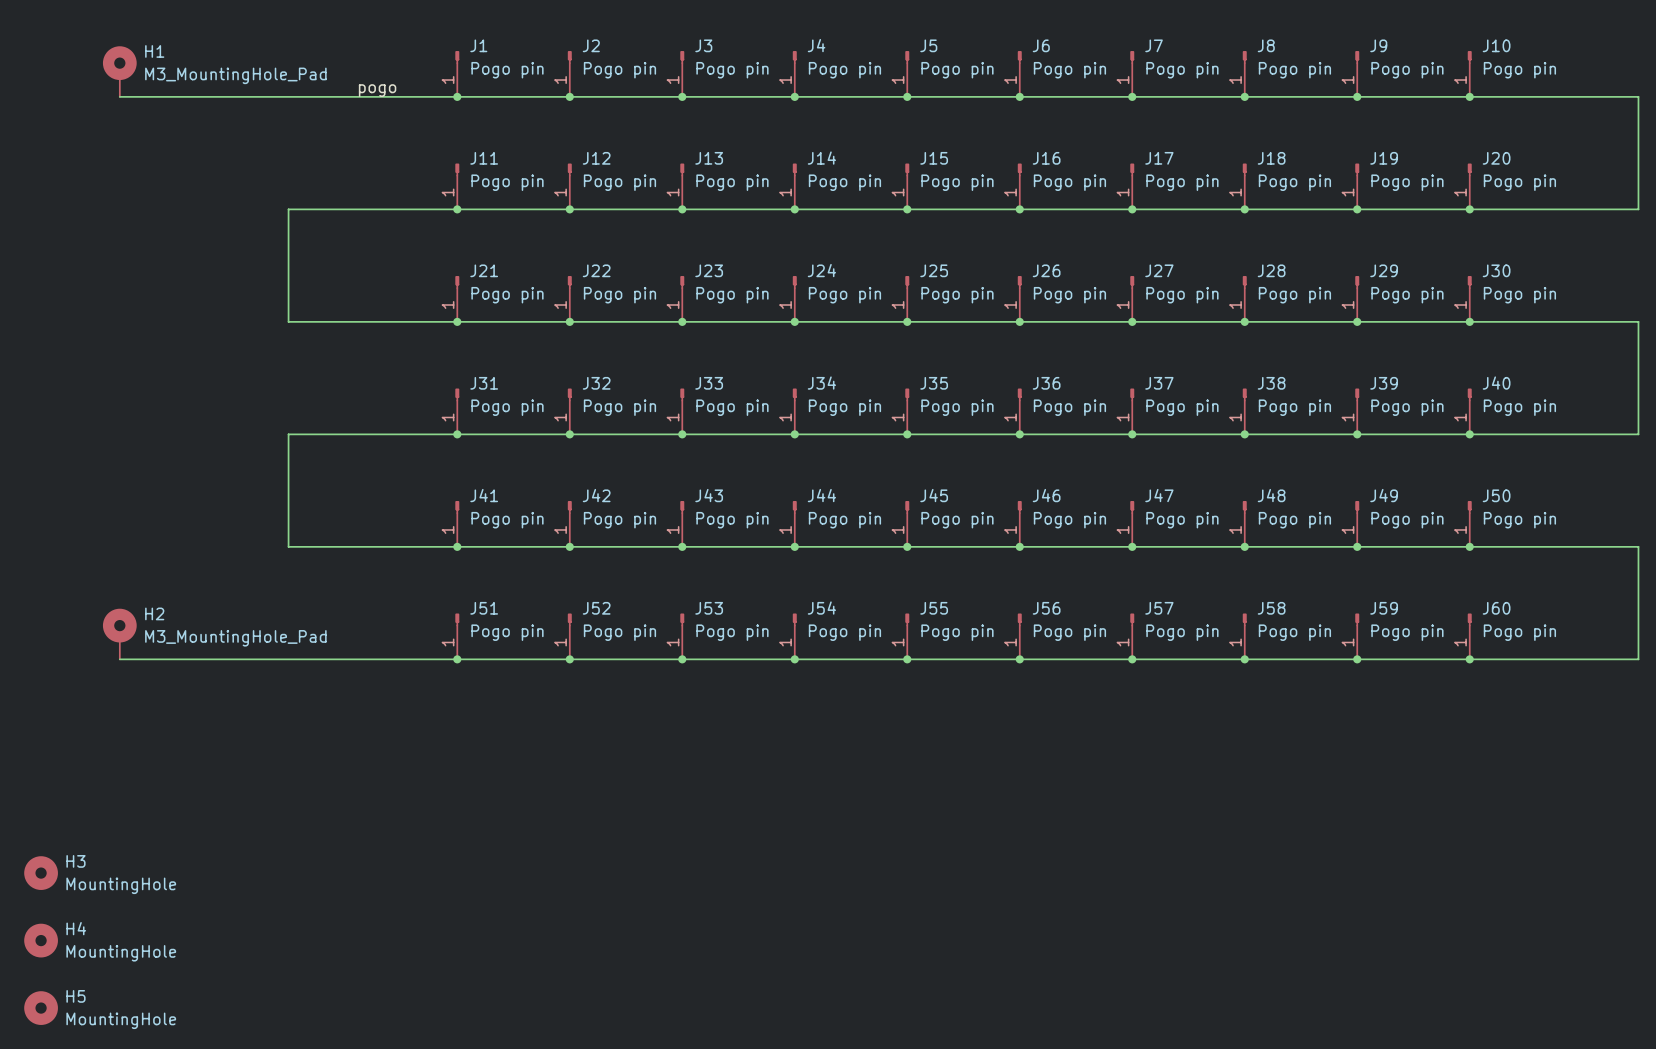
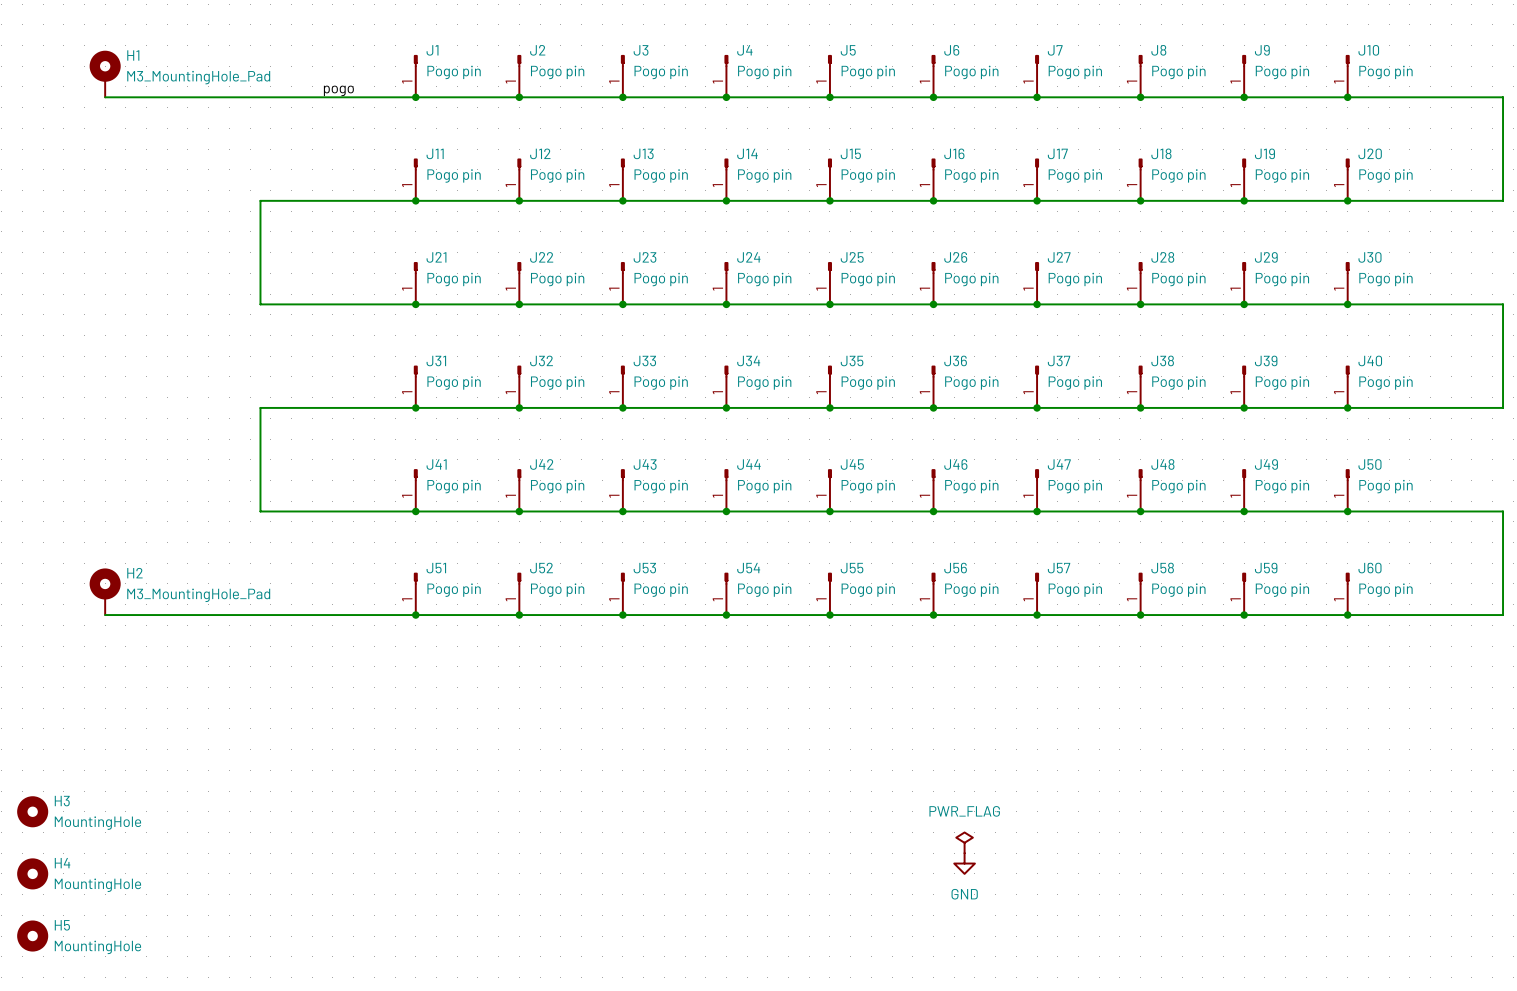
power symbol: none -> PWR_FLAG (964, 842)
power symbol: none -> GND (964, 863)

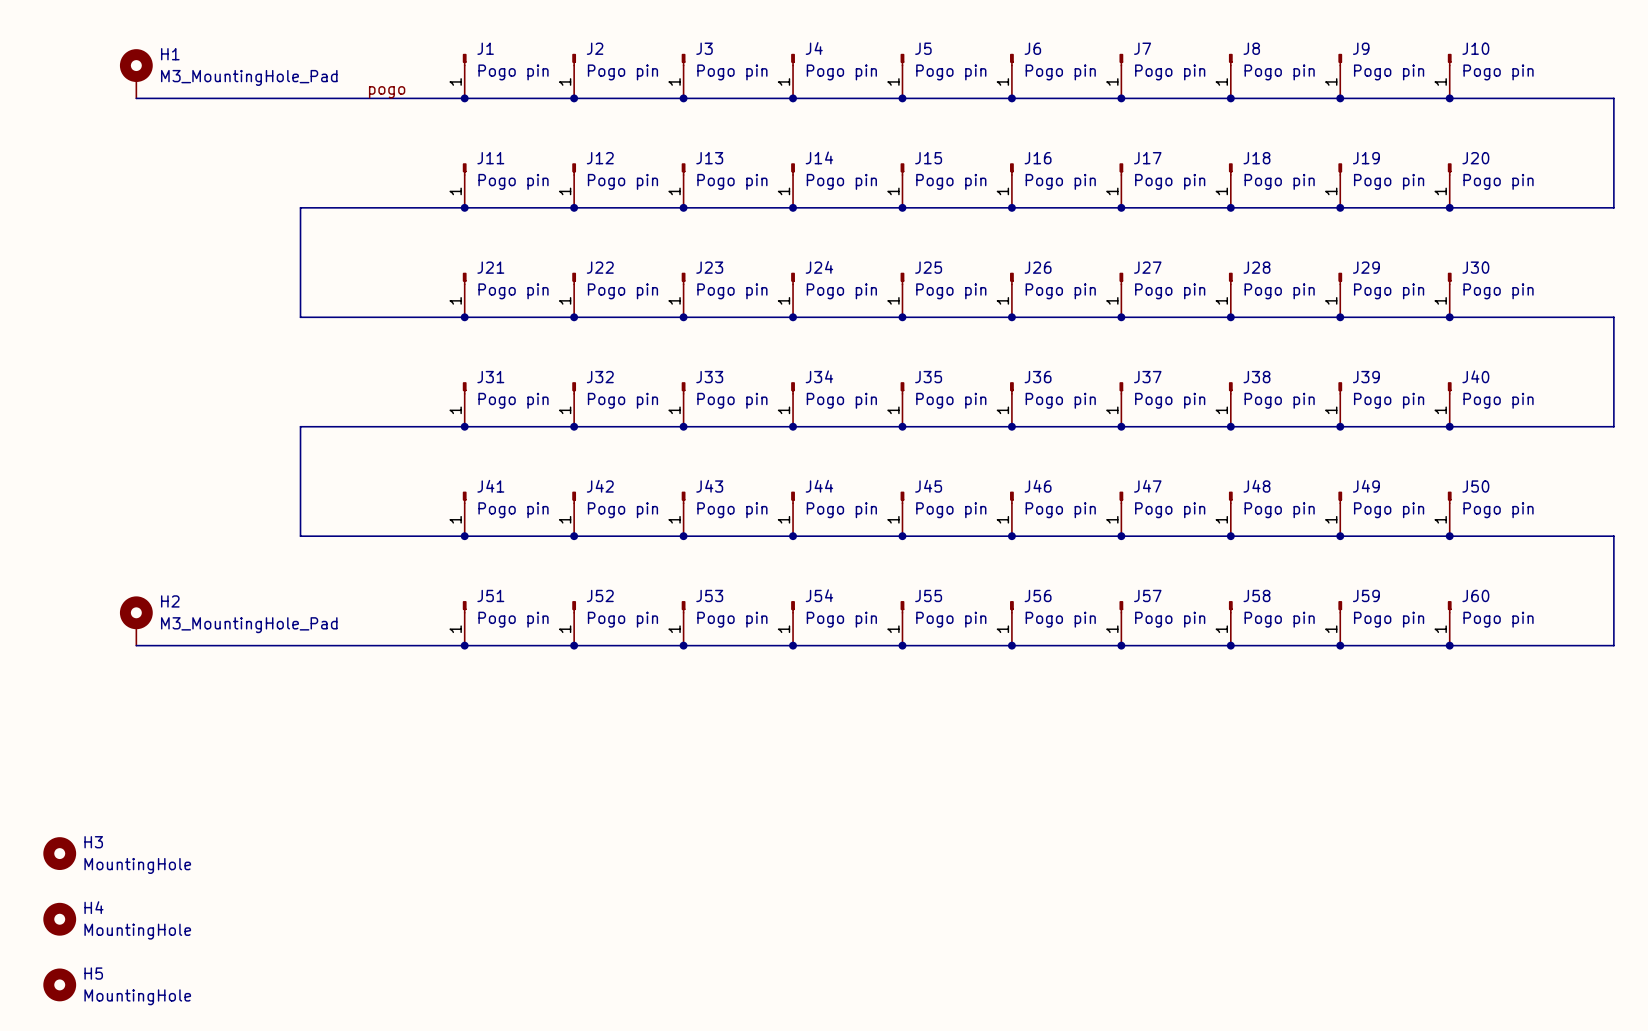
power symbol: PWR_FLAG (964, 842) -> none
power symbol: GND (964, 863) -> none

